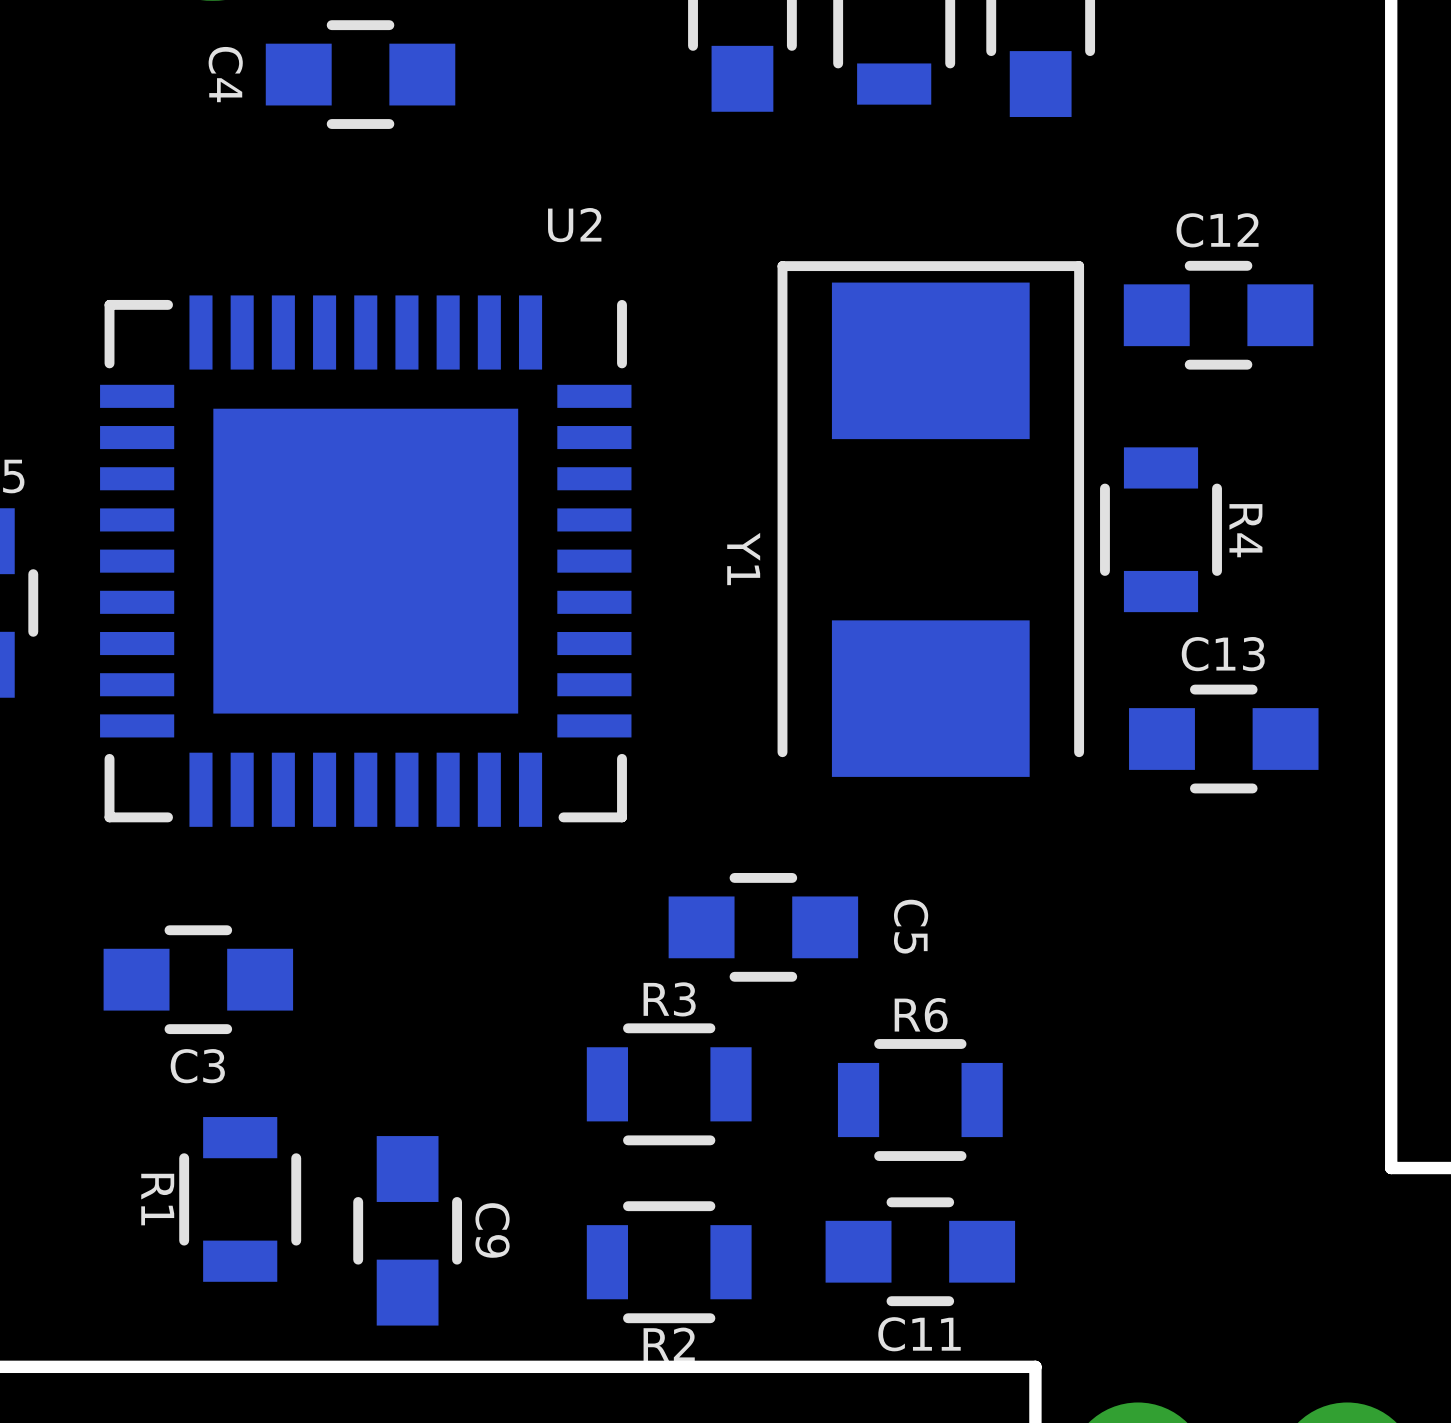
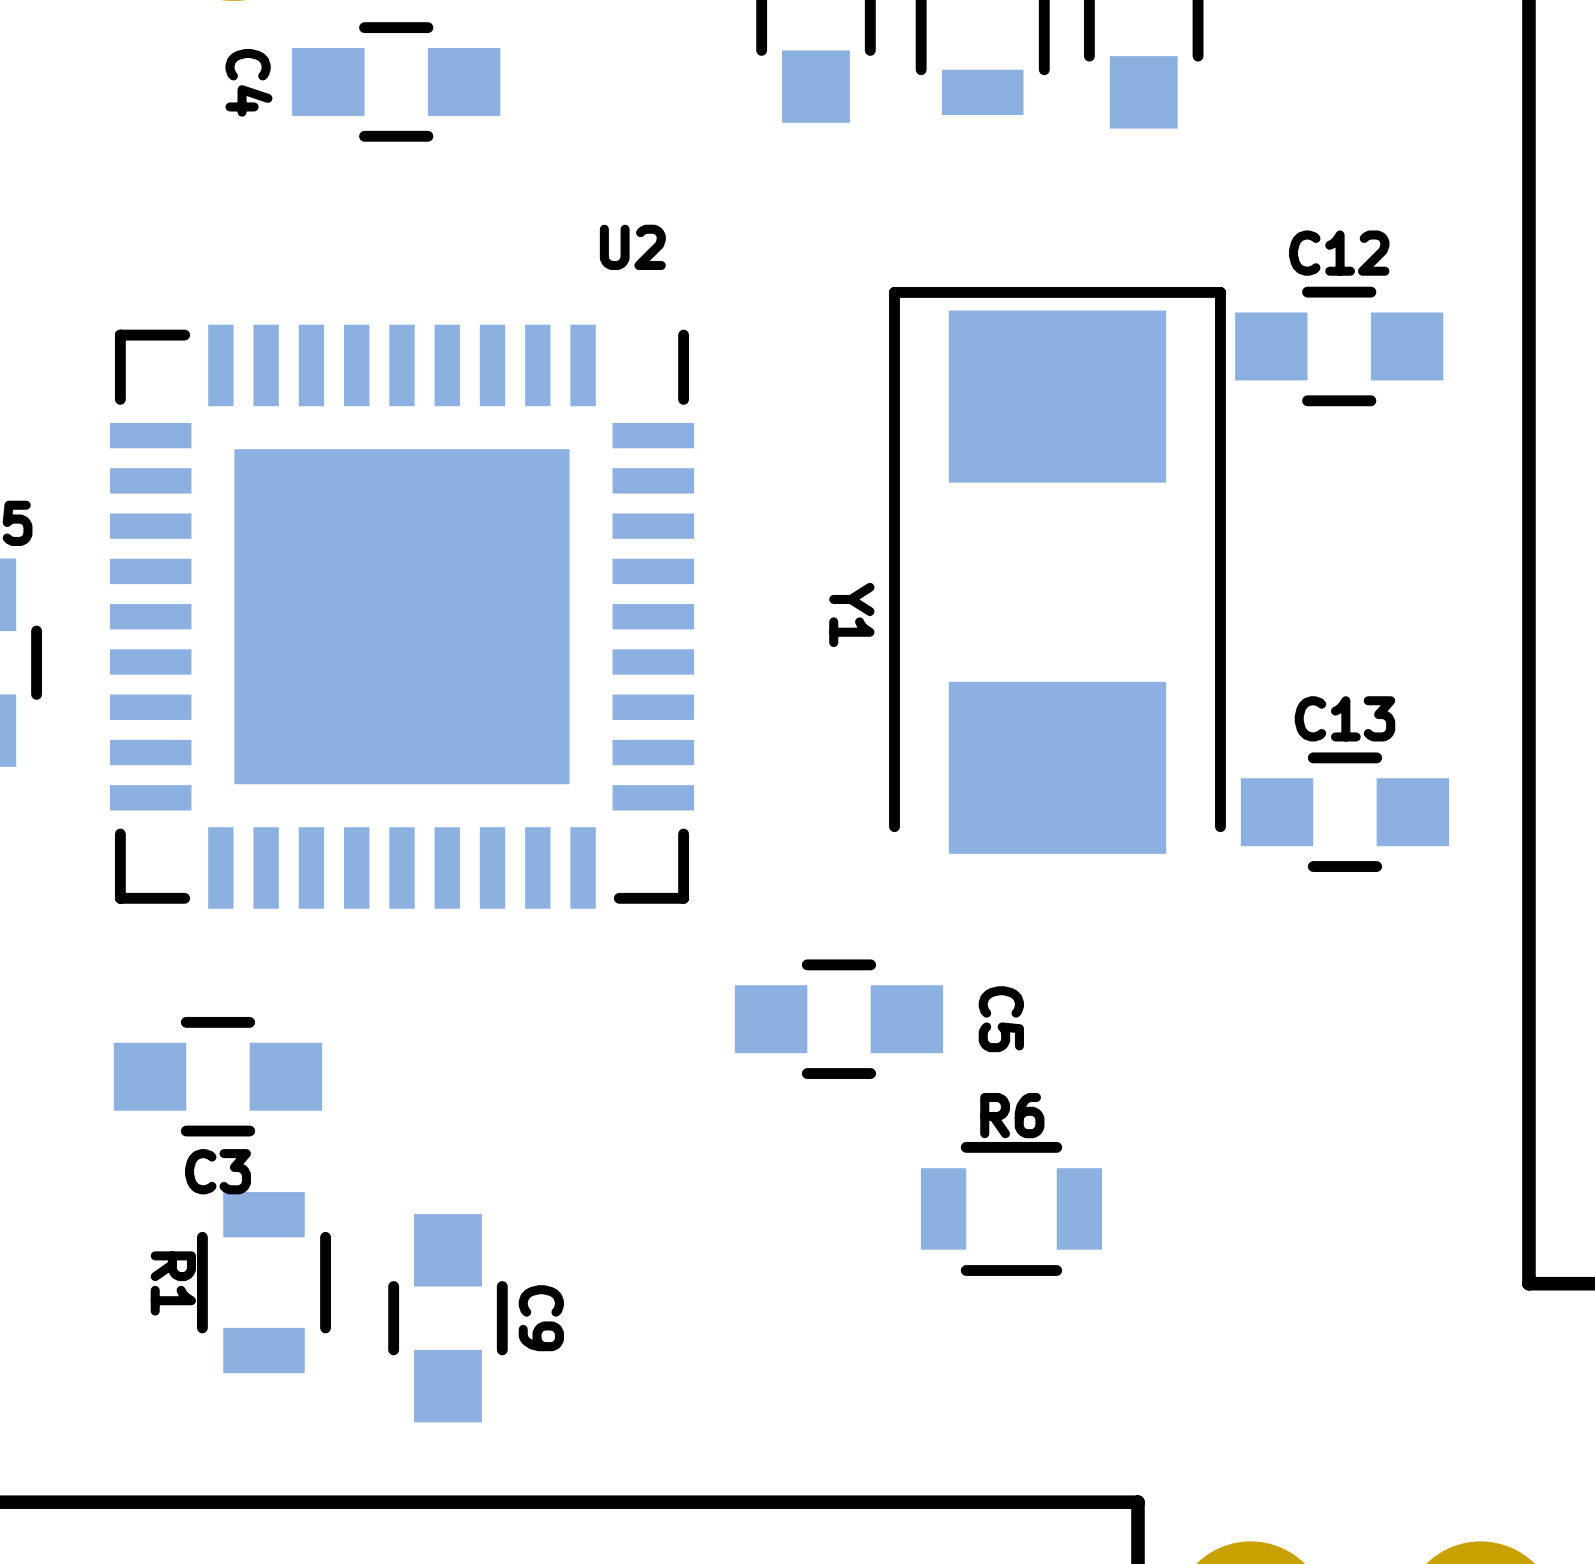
Y1 position: (930, 519) -> (1057, 570)
R4: (1161, 529) -> none
R3: (669, 1084) -> none
R1 position: (240, 1199) -> (263, 1282)
C9 position: (407, 1230) -> (447, 1318)
C11: (920, 1251) -> none
R2: (669, 1262) -> none

